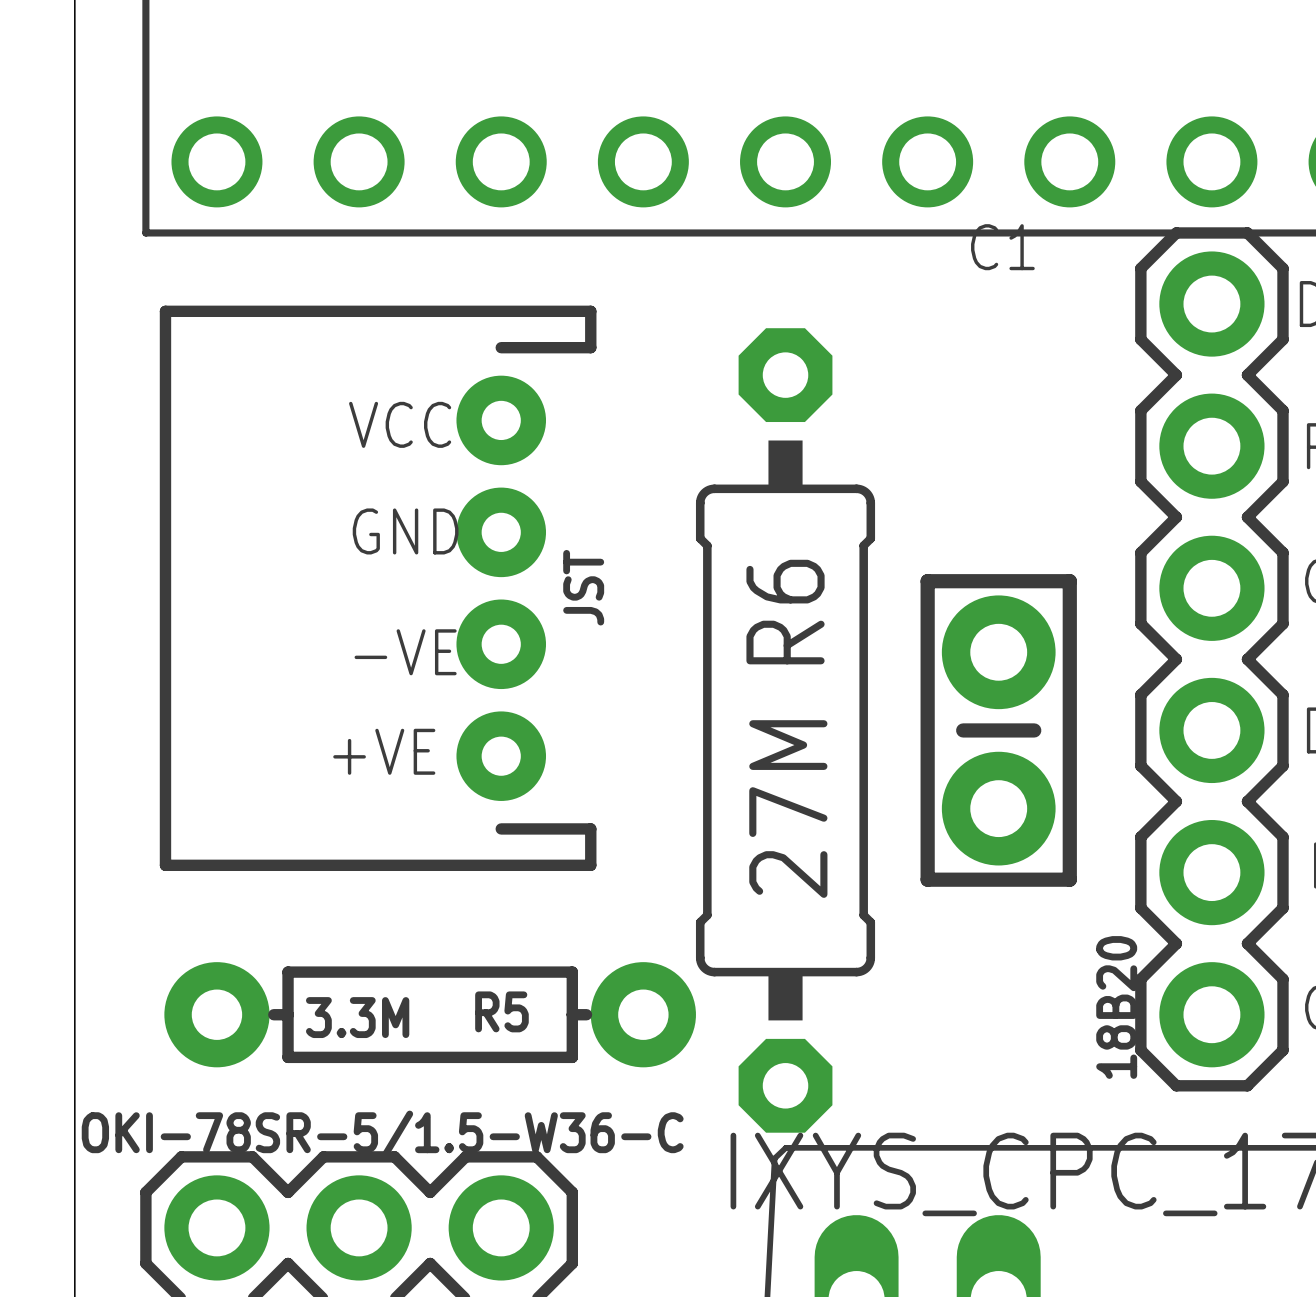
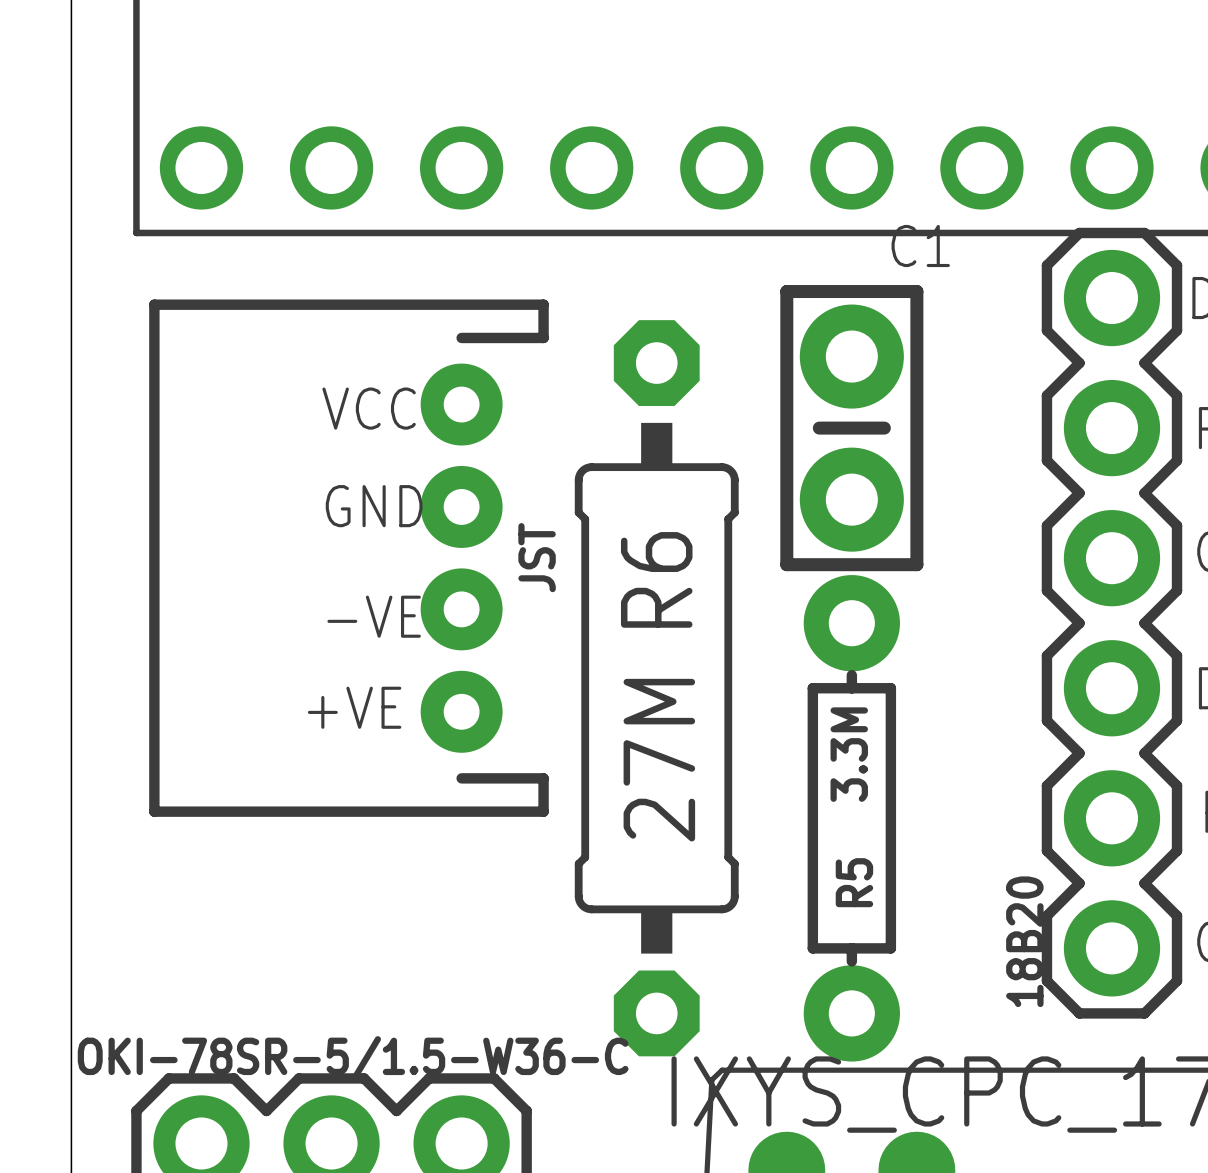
R6 position: (785, 730) -> (656, 688)
part position: (998, 730) -> (851, 428)
R5 rotation: 0° (430, 1014) -> 90° clockwise (851, 818)
R5 position: (430, 1014) -> (851, 818)

